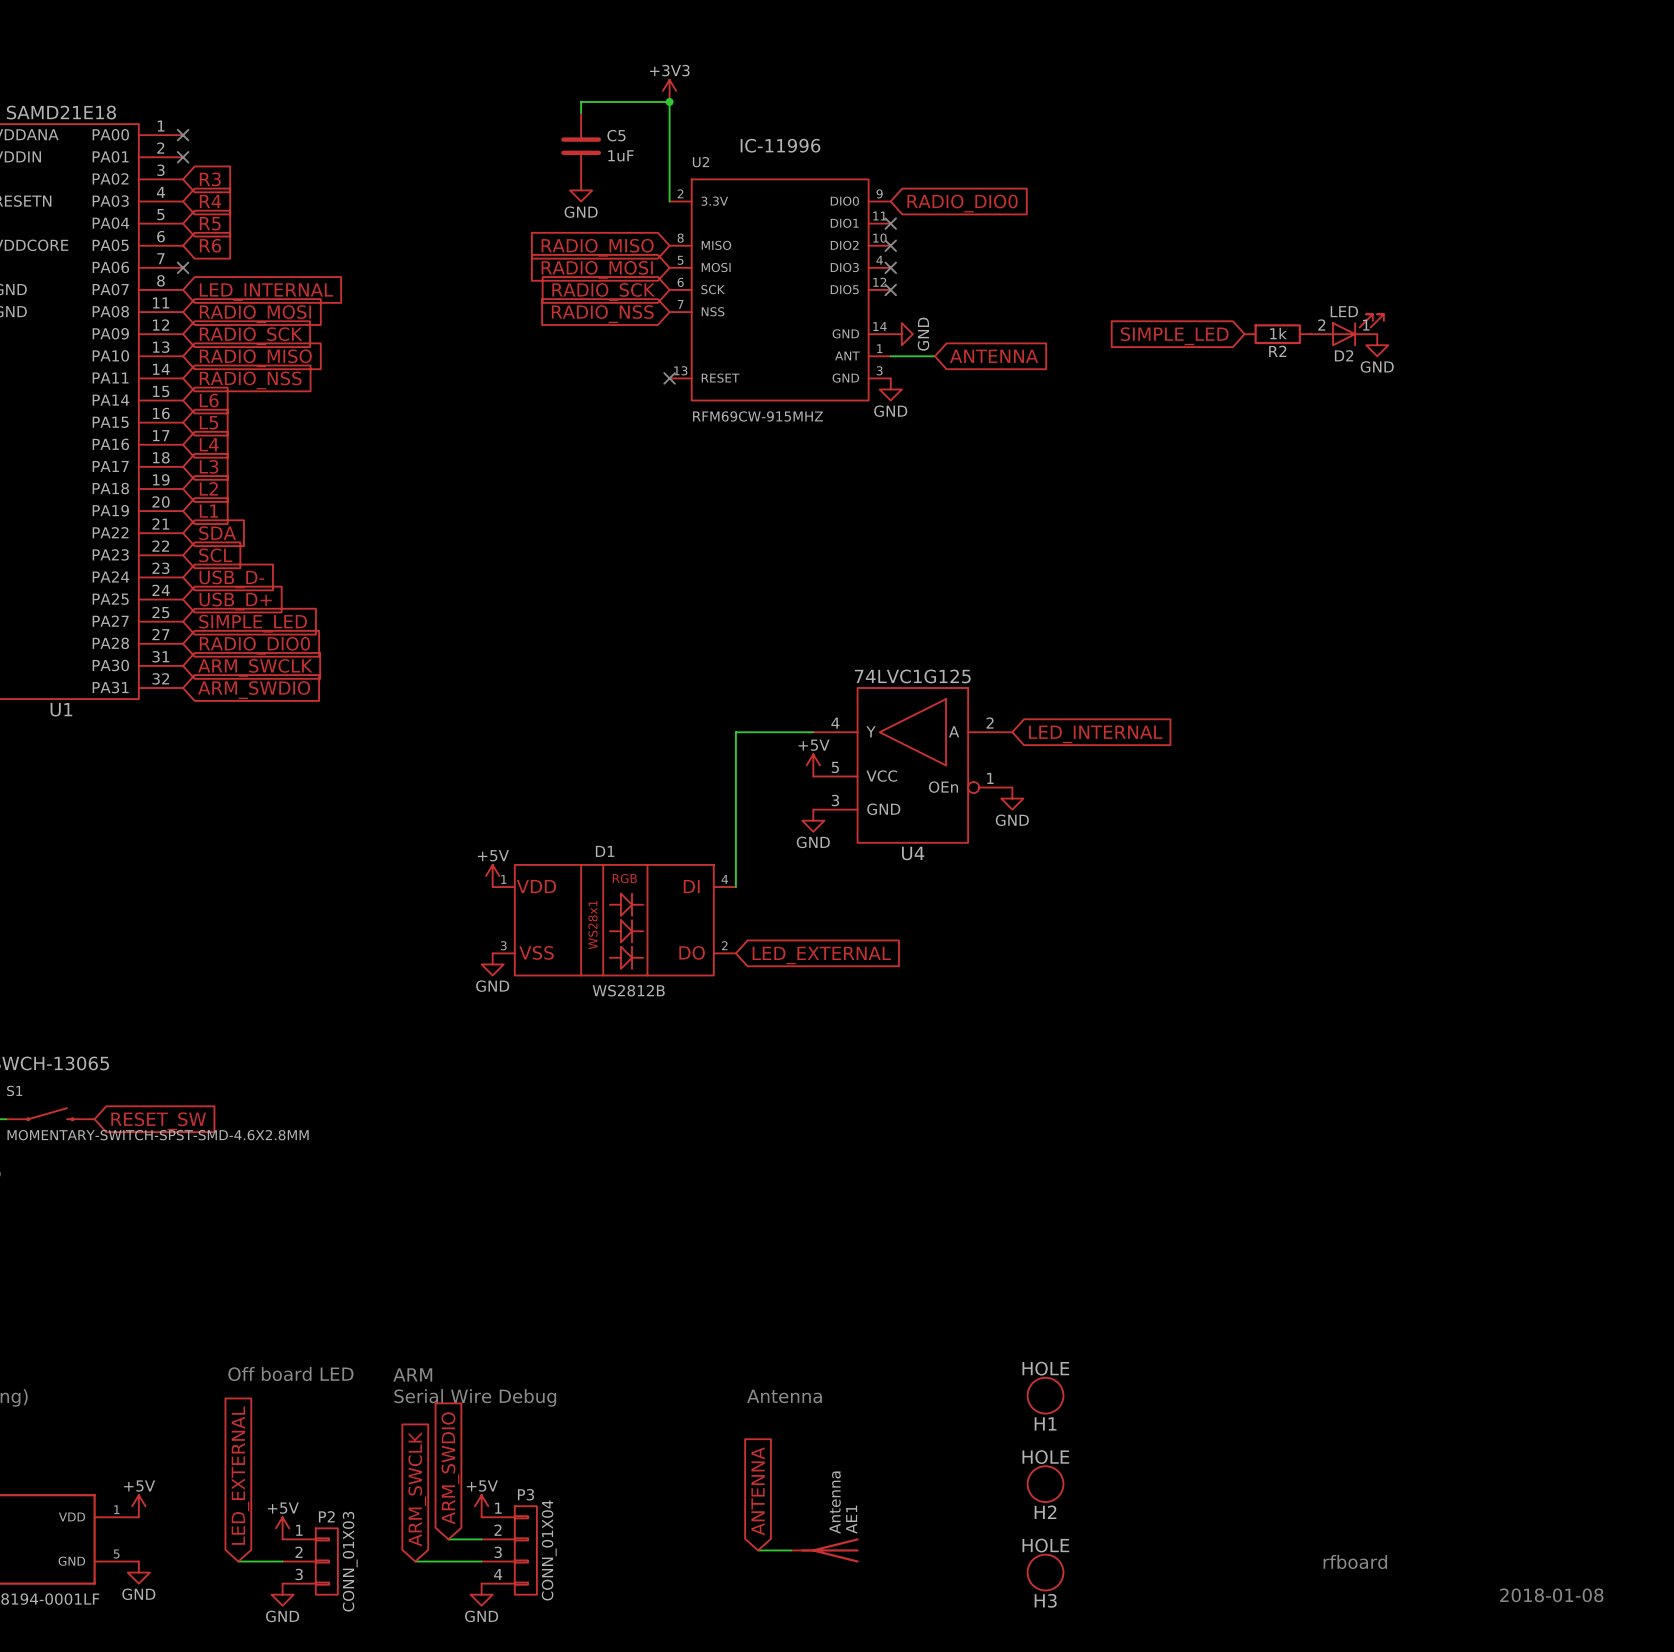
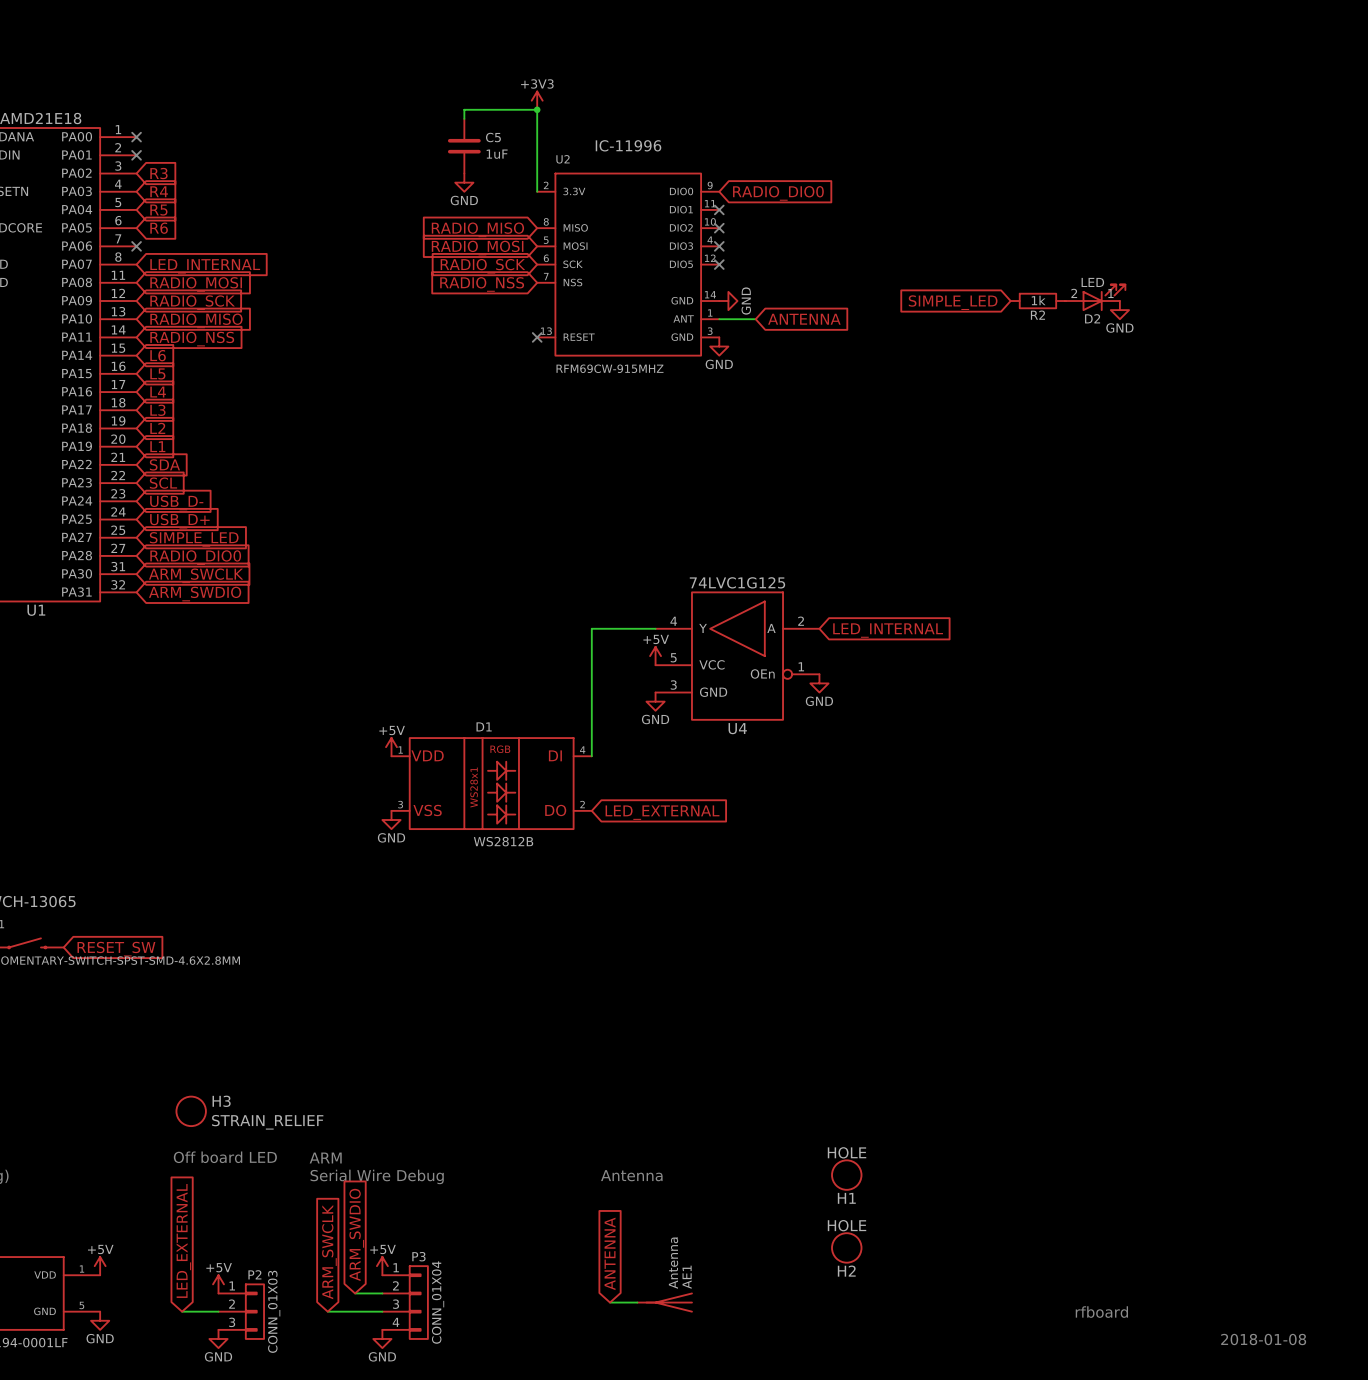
H3 value: HOLE (1045, 1545) -> STRAIN_RELIEF (267, 1122)
H3 position: (1045, 1572) -> (191, 1111)
H3 name position: H3 (1045, 1600) -> H3 (221, 1101)

